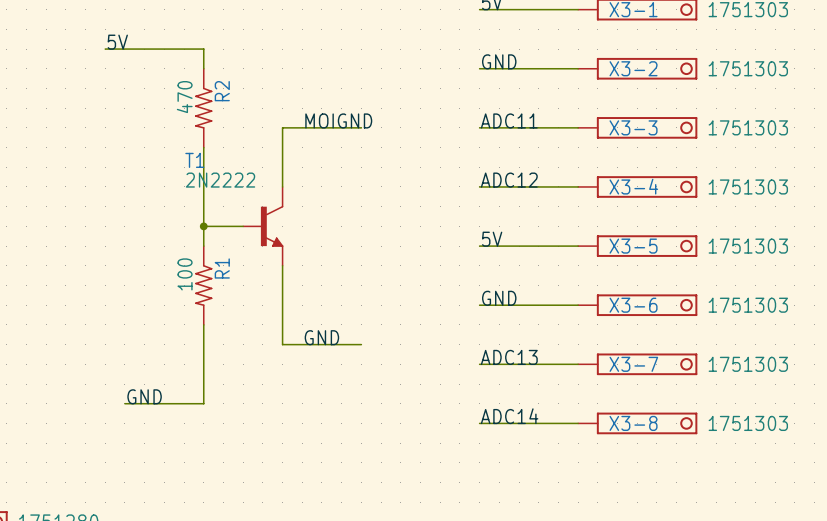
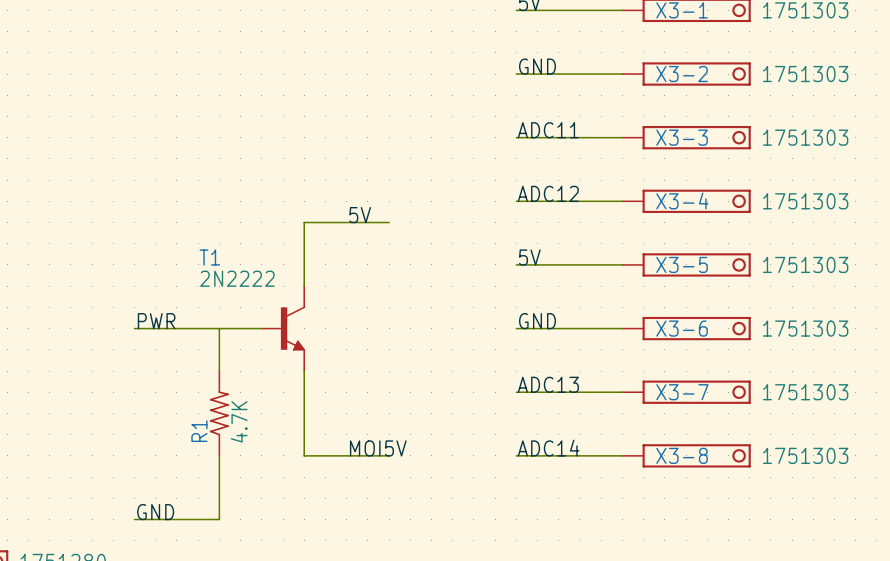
label: 5V (117, 42) -> none
wire: (105, 49) (203, 49) (203, 68) -> none
R2: 470 (203, 108) -> none
label: MOIGND (338, 120) -> none
wire: (361, 127) (282, 127) (282, 186) -> none
wire: (203, 147) (203, 246) -> none
label: none -> 5V (360, 215)
wire: (203, 226) (243, 226) -> none
junction: (203, 226) -> none
T1 position: (263, 226) -> (283, 328)
wire: (282, 265) (282, 344) (361, 344) -> (304, 286) (304, 222) (389, 222)
R1 value: 100 (185, 274) -> 4.7K (239, 421)
R1 rotation: 0° (203, 285) -> 180° (219, 413)
R1 position: (203, 285) -> (219, 413)
label: none -> PWR (156, 321)
wire: none -> (134, 328) (261, 328)
label: GND (321, 337) -> none
wire: (203, 344) (203, 403) (124, 403) -> (219, 455) (219, 519) (134, 519)
wire: none -> (304, 371) (304, 455) (389, 455)
label position: GND (144, 396) -> GND (155, 512)
label: none -> MOI5V (378, 448)

